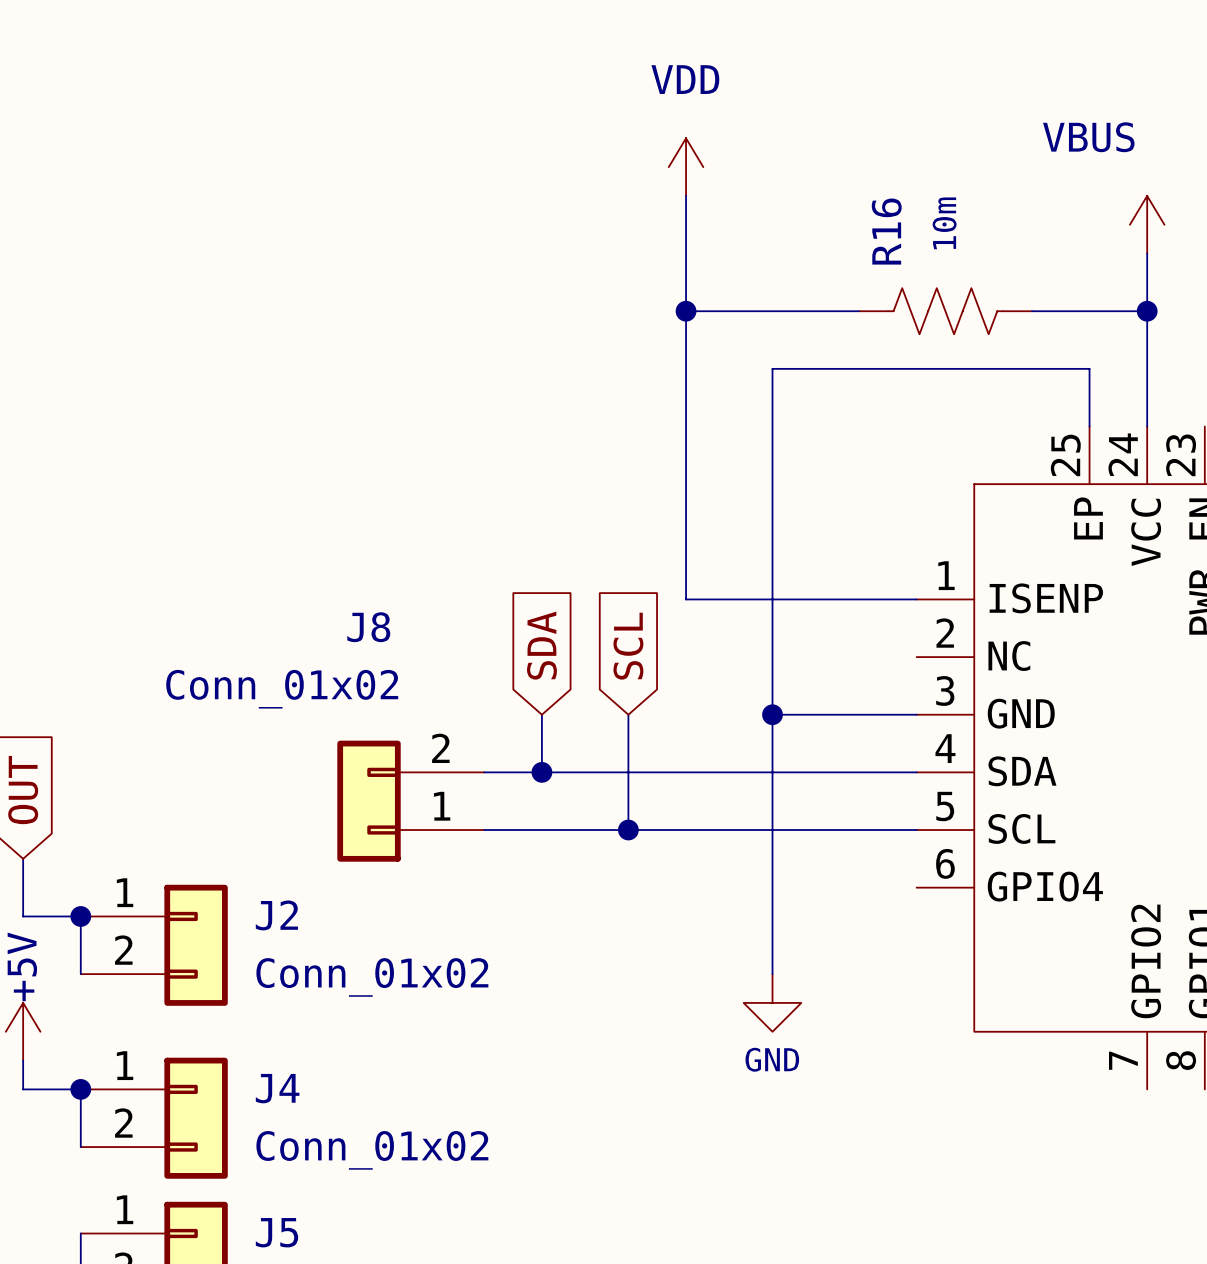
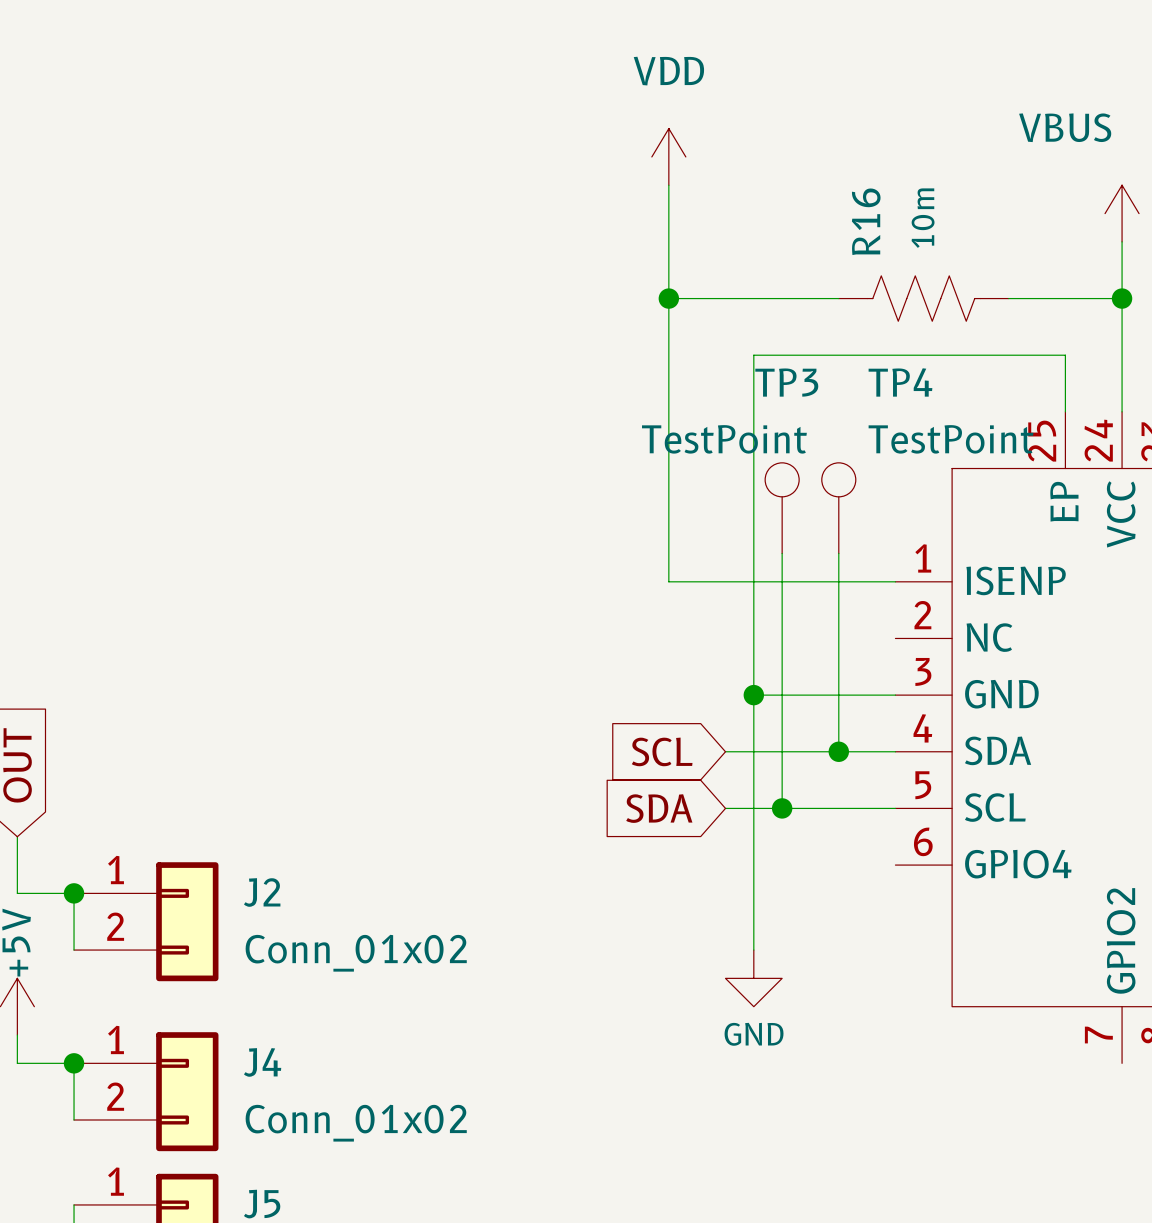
TP3: none -> TestPoint (782, 508)
TP4: none -> TestPoint (838, 508)
wire: none -> (782, 553) (782, 808)
wire: none -> (838, 553) (838, 751)
global label rotation: 0° (541, 645) -> 90° counterclockwise (659, 808)
global label position: SDA (541, 645) -> SDA (659, 808)
global label rotation: 0° (628, 646) -> 90° counterclockwise (662, 751)
wire: (541, 714) (541, 772) -> none
wire: (628, 714) (628, 830) -> none
wire: (484, 772) (743, 772) -> none
junction: (541, 772) -> none
junction: none -> (838, 751)
J8: Conn_01x02 (410, 801) -> none
wire: (484, 830) (743, 830) -> none
junction: (628, 830) -> none
junction: none -> (782, 808)

